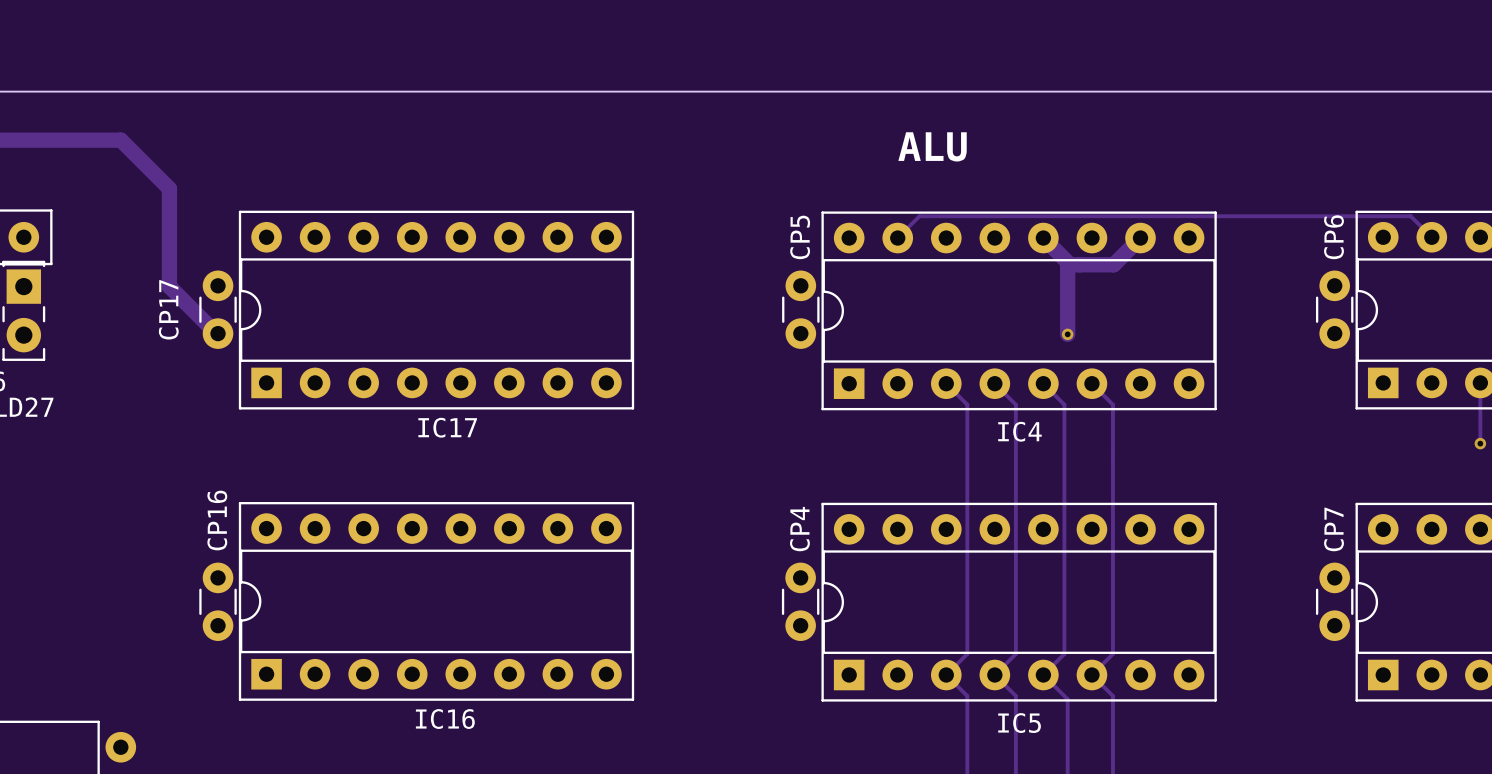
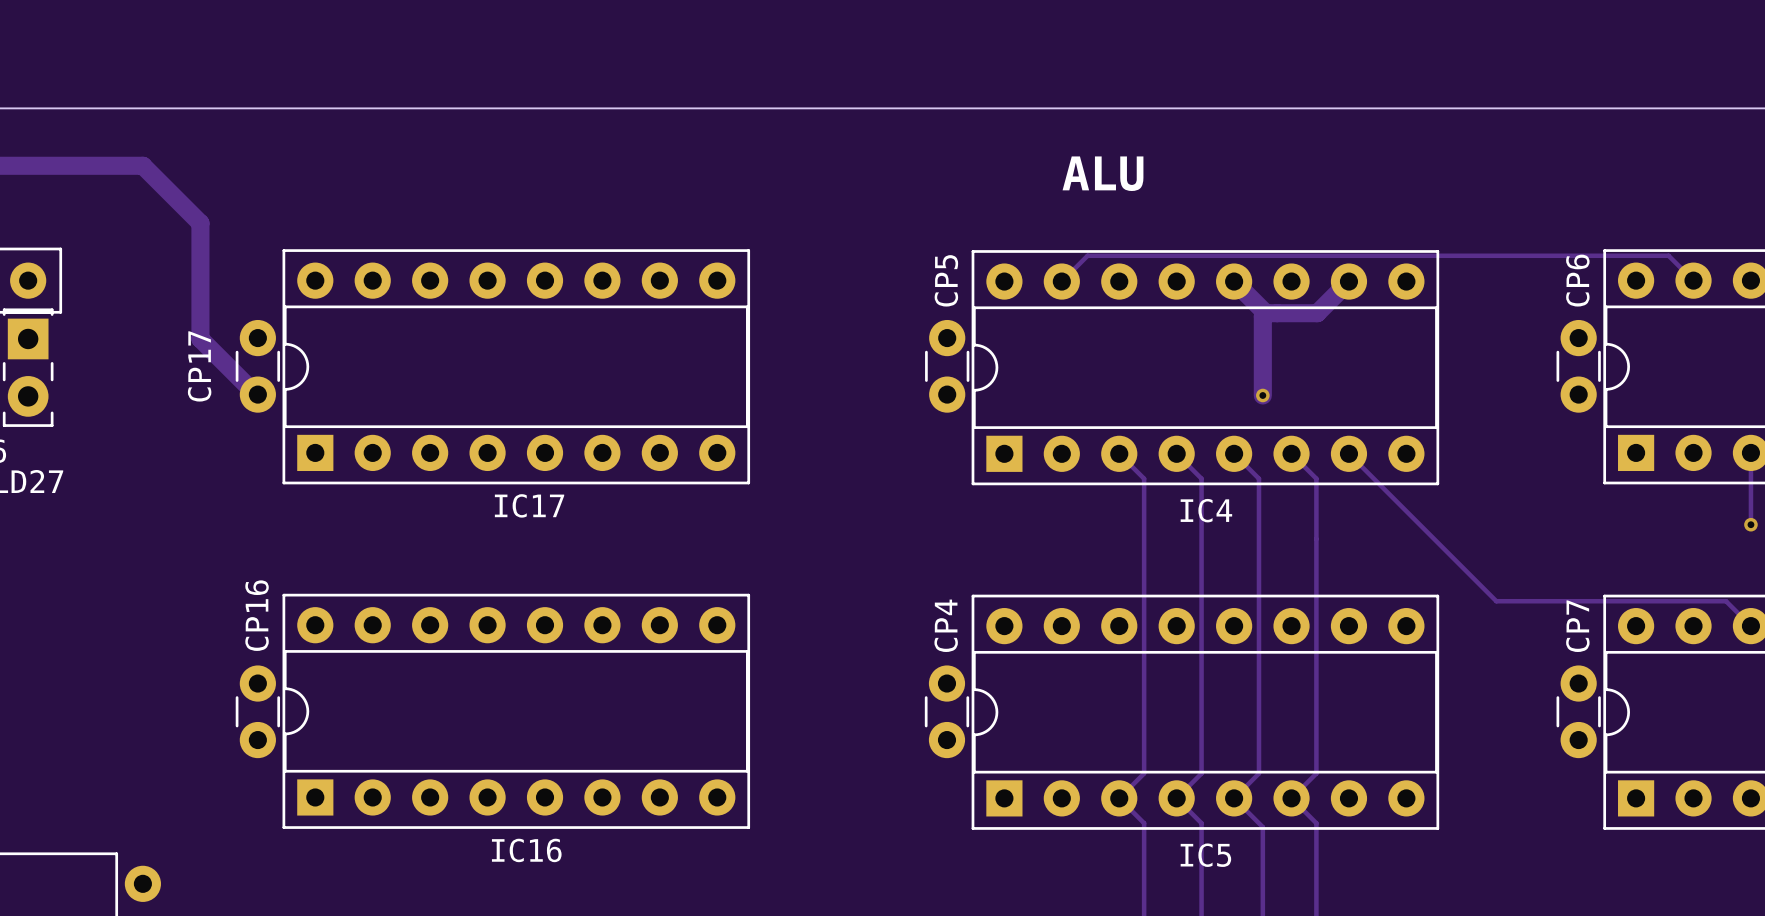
track: none -> (1348, 453) (1496, 601) (1726, 601) (1750, 626)

